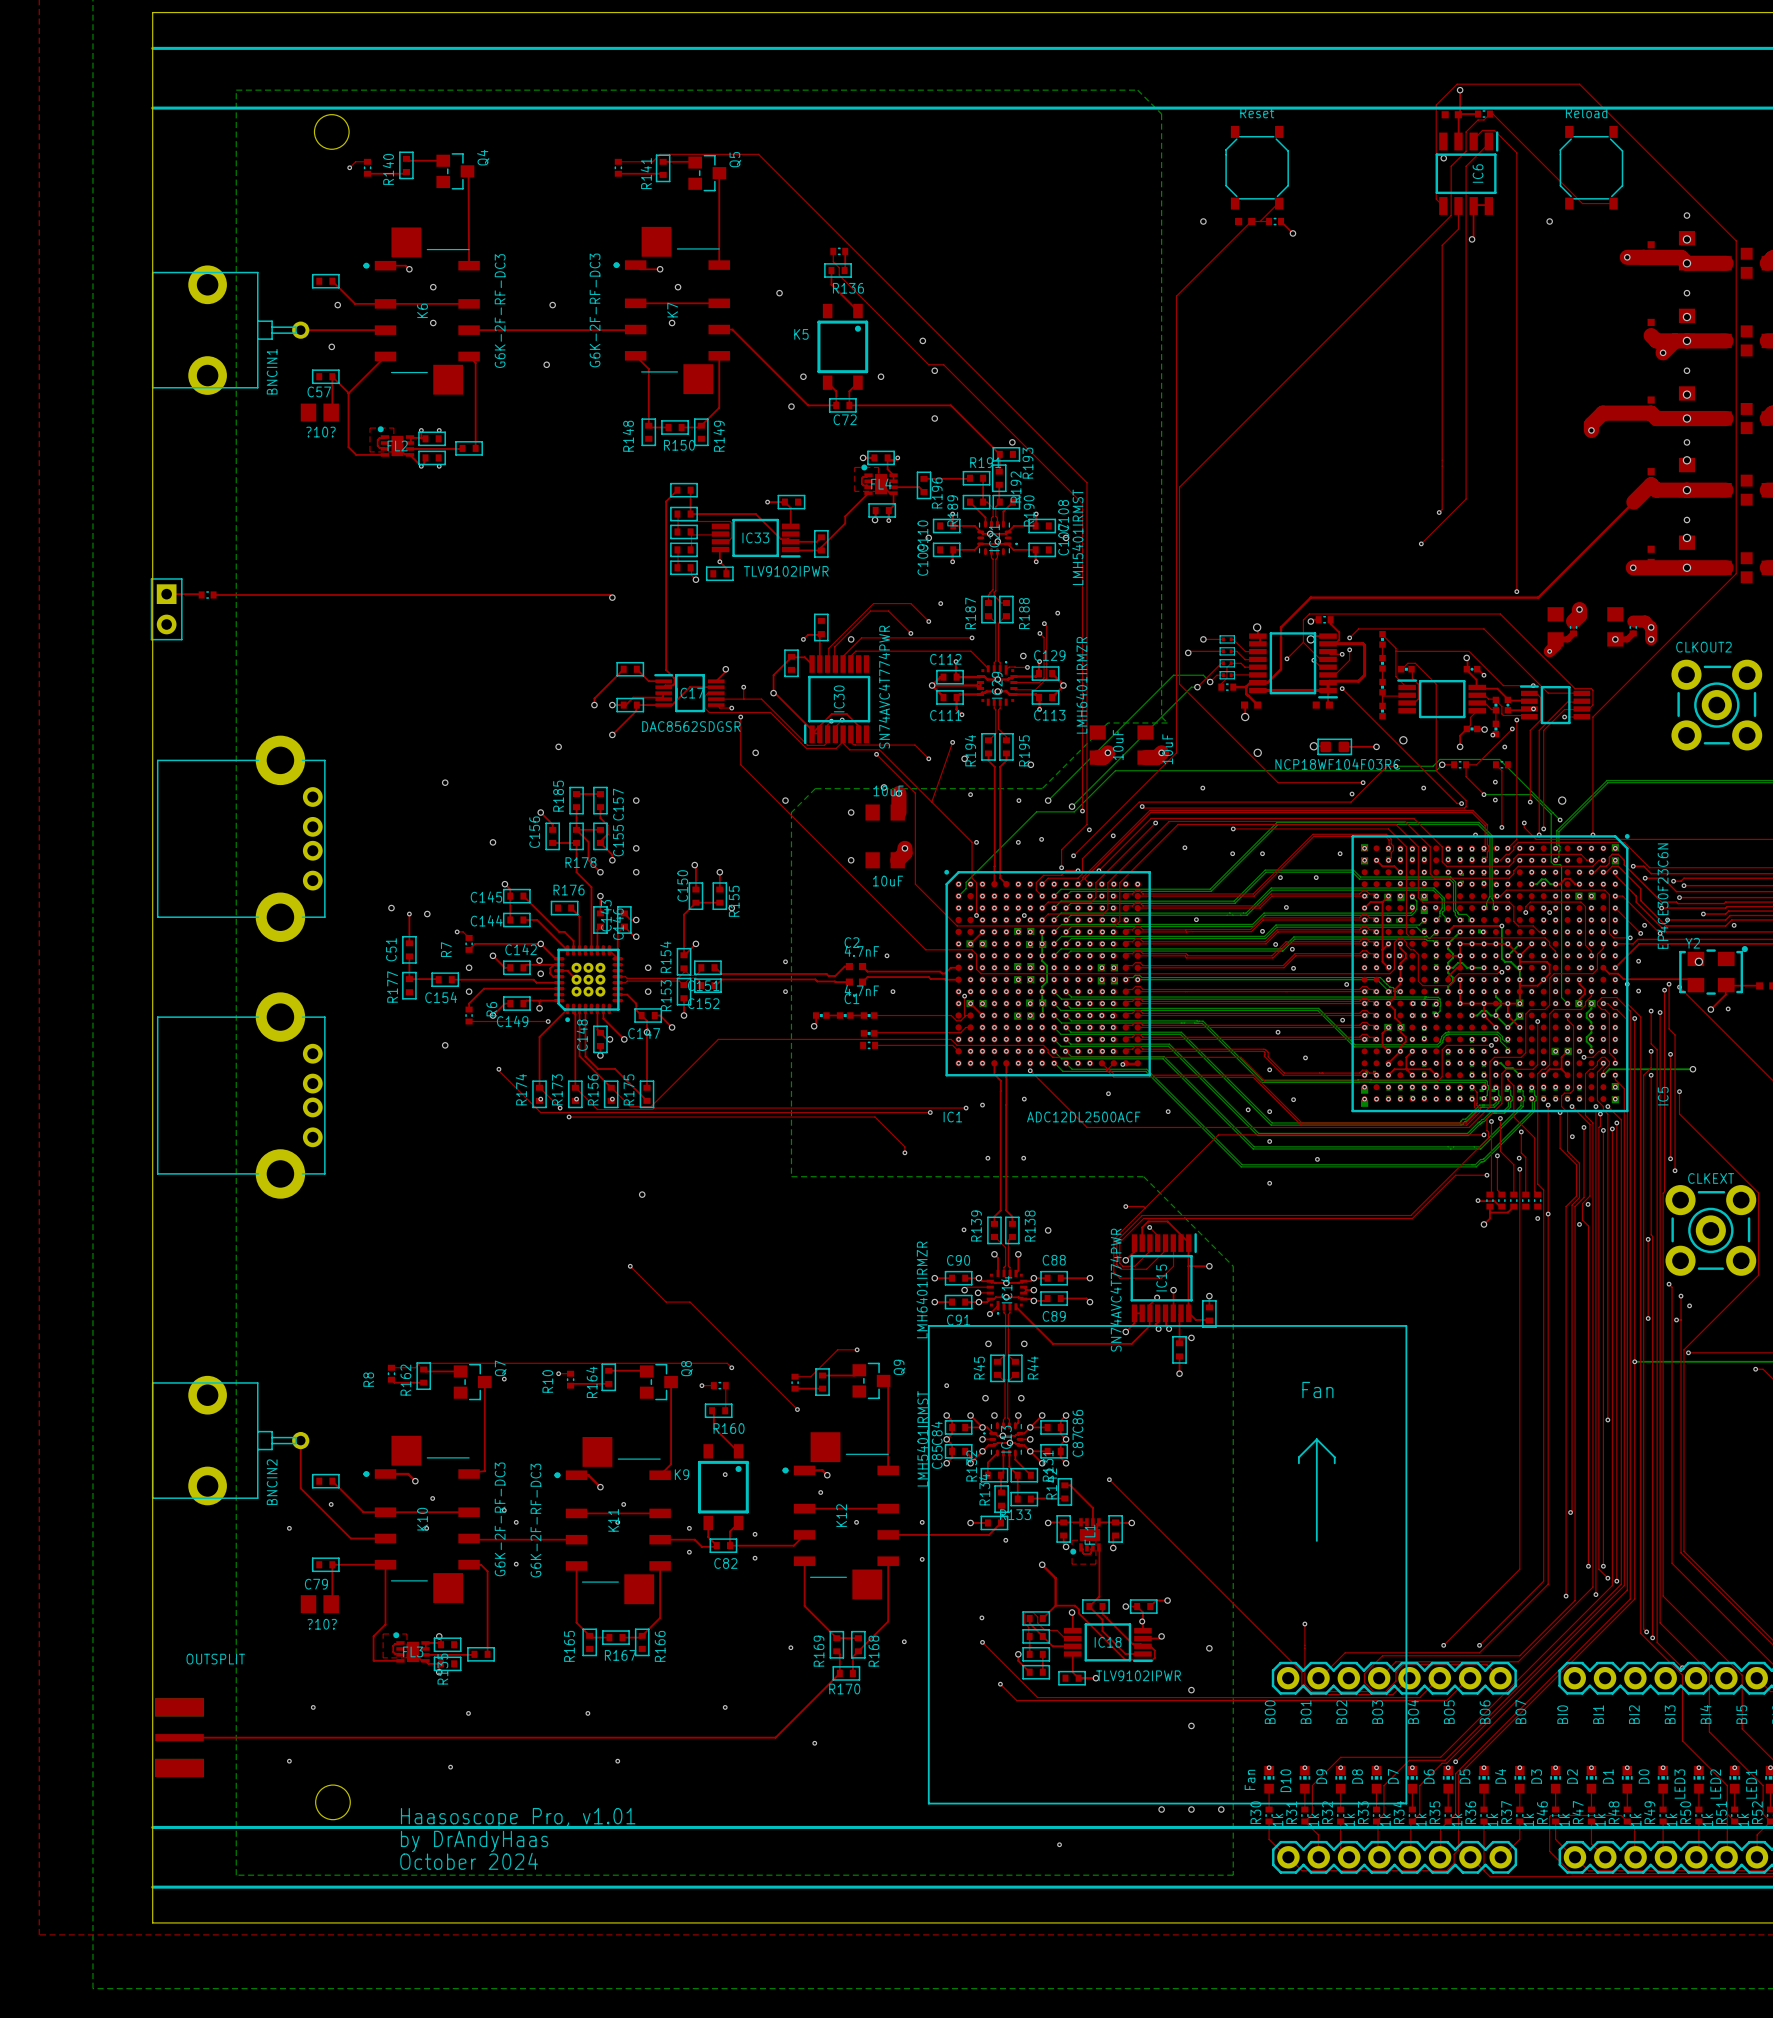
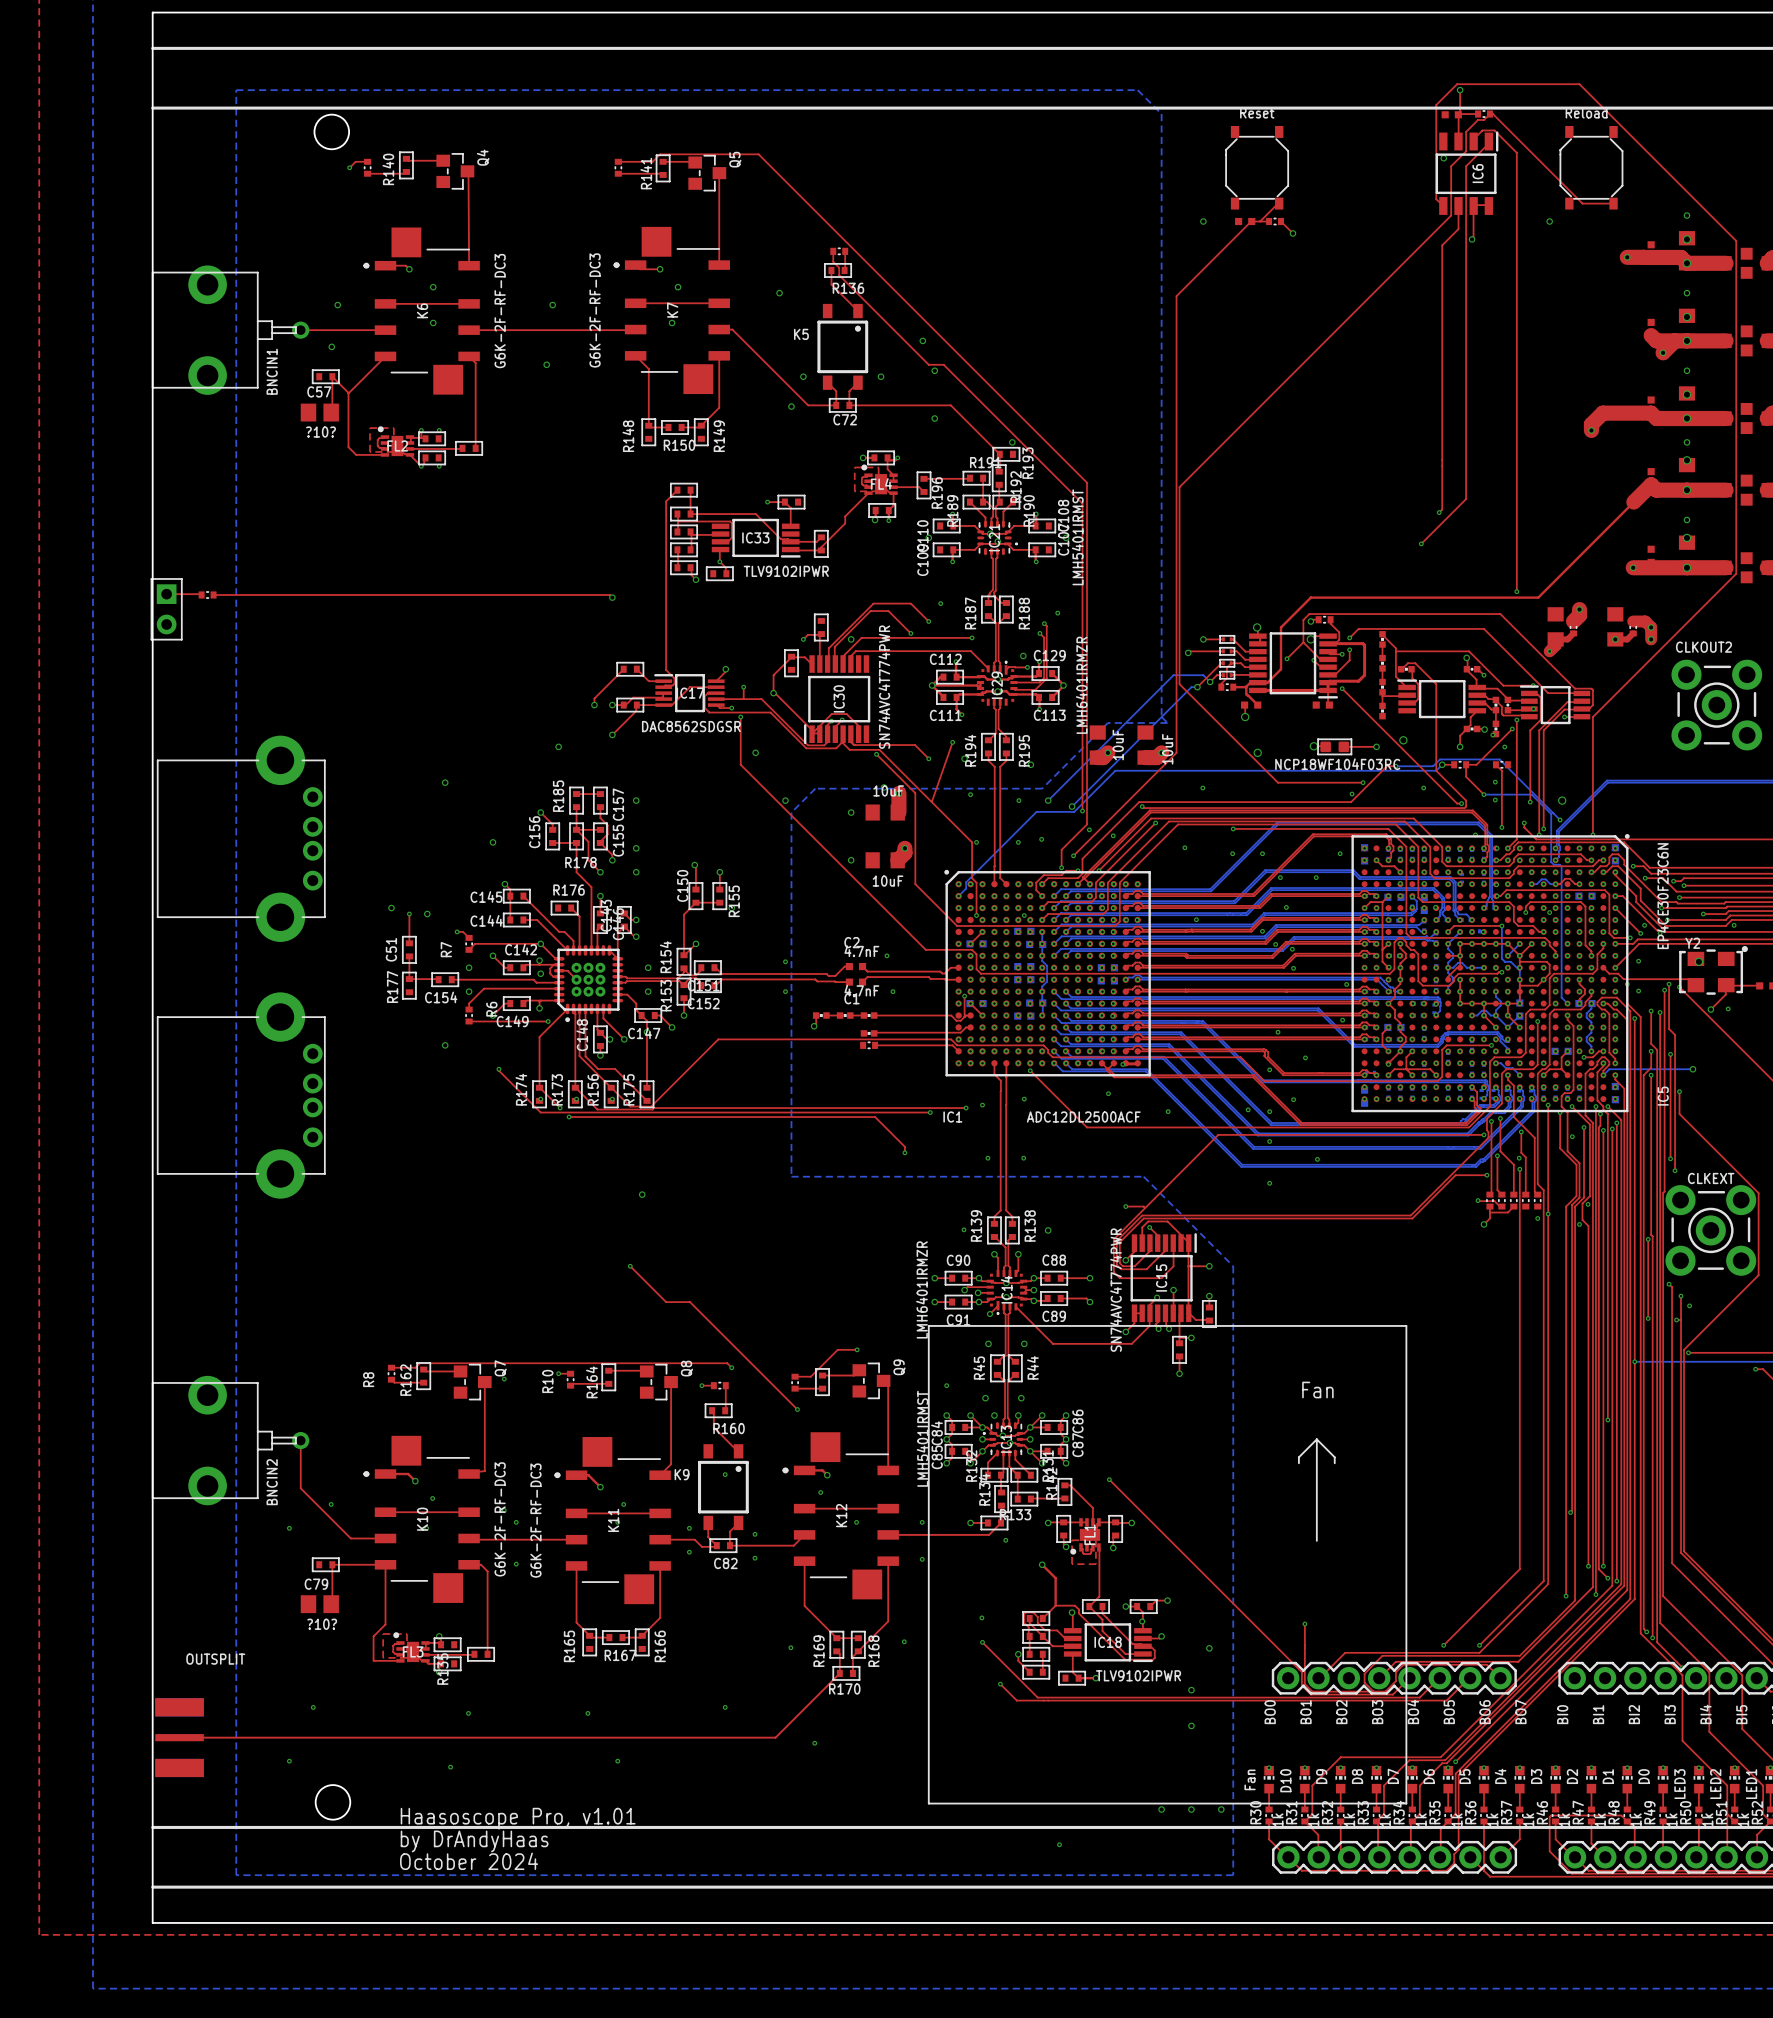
part: (325, 281) -> none
top track: (332, 281) (355, 303) (385, 303) -> none
part: (325, 1481) -> none
top track: (332, 1481) (363, 1512) (385, 1512) -> none

